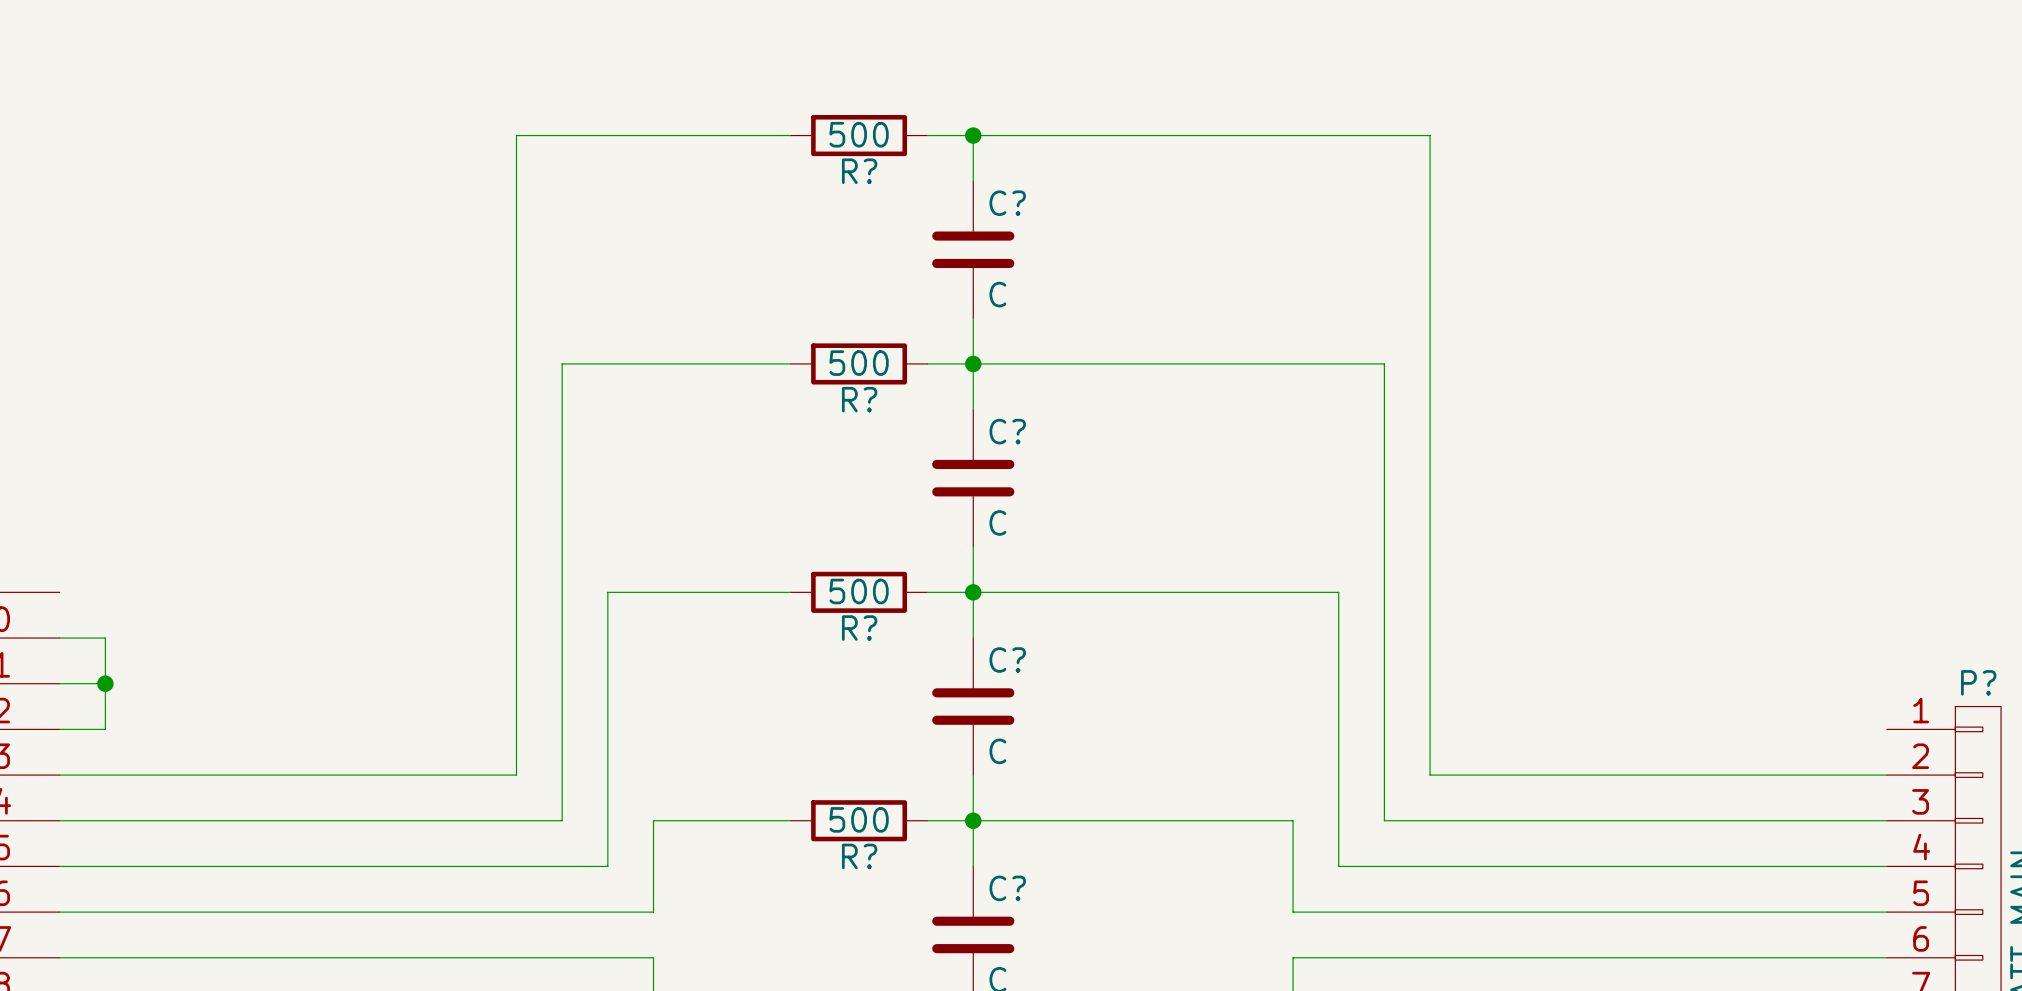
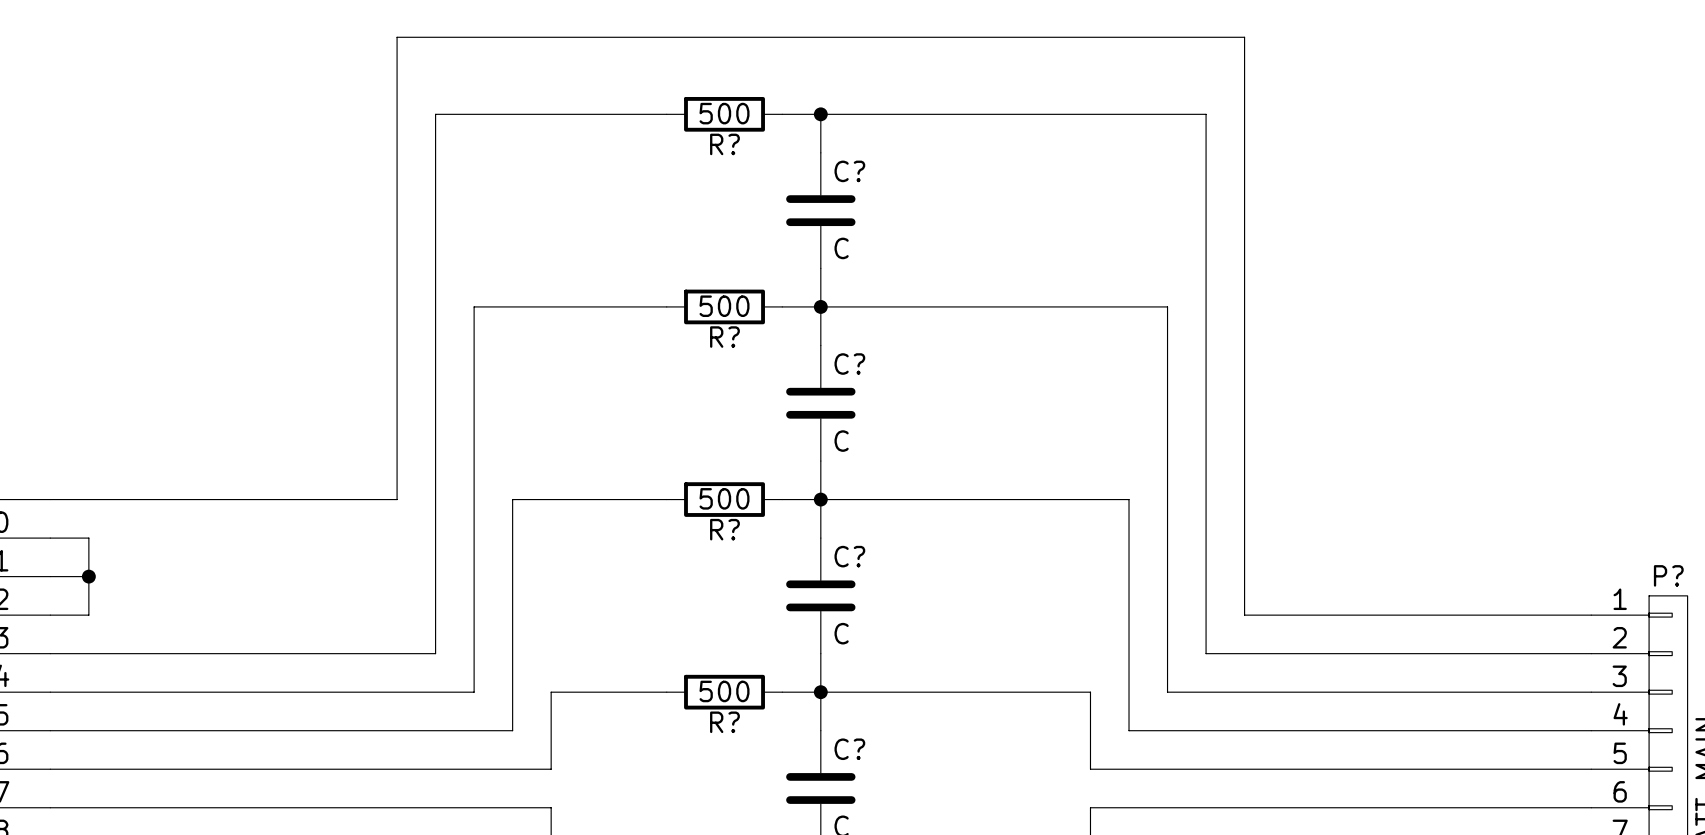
wire: none -> (50, 499) (397, 499) (397, 37) (1244, 37) (1244, 615) (1591, 615)

